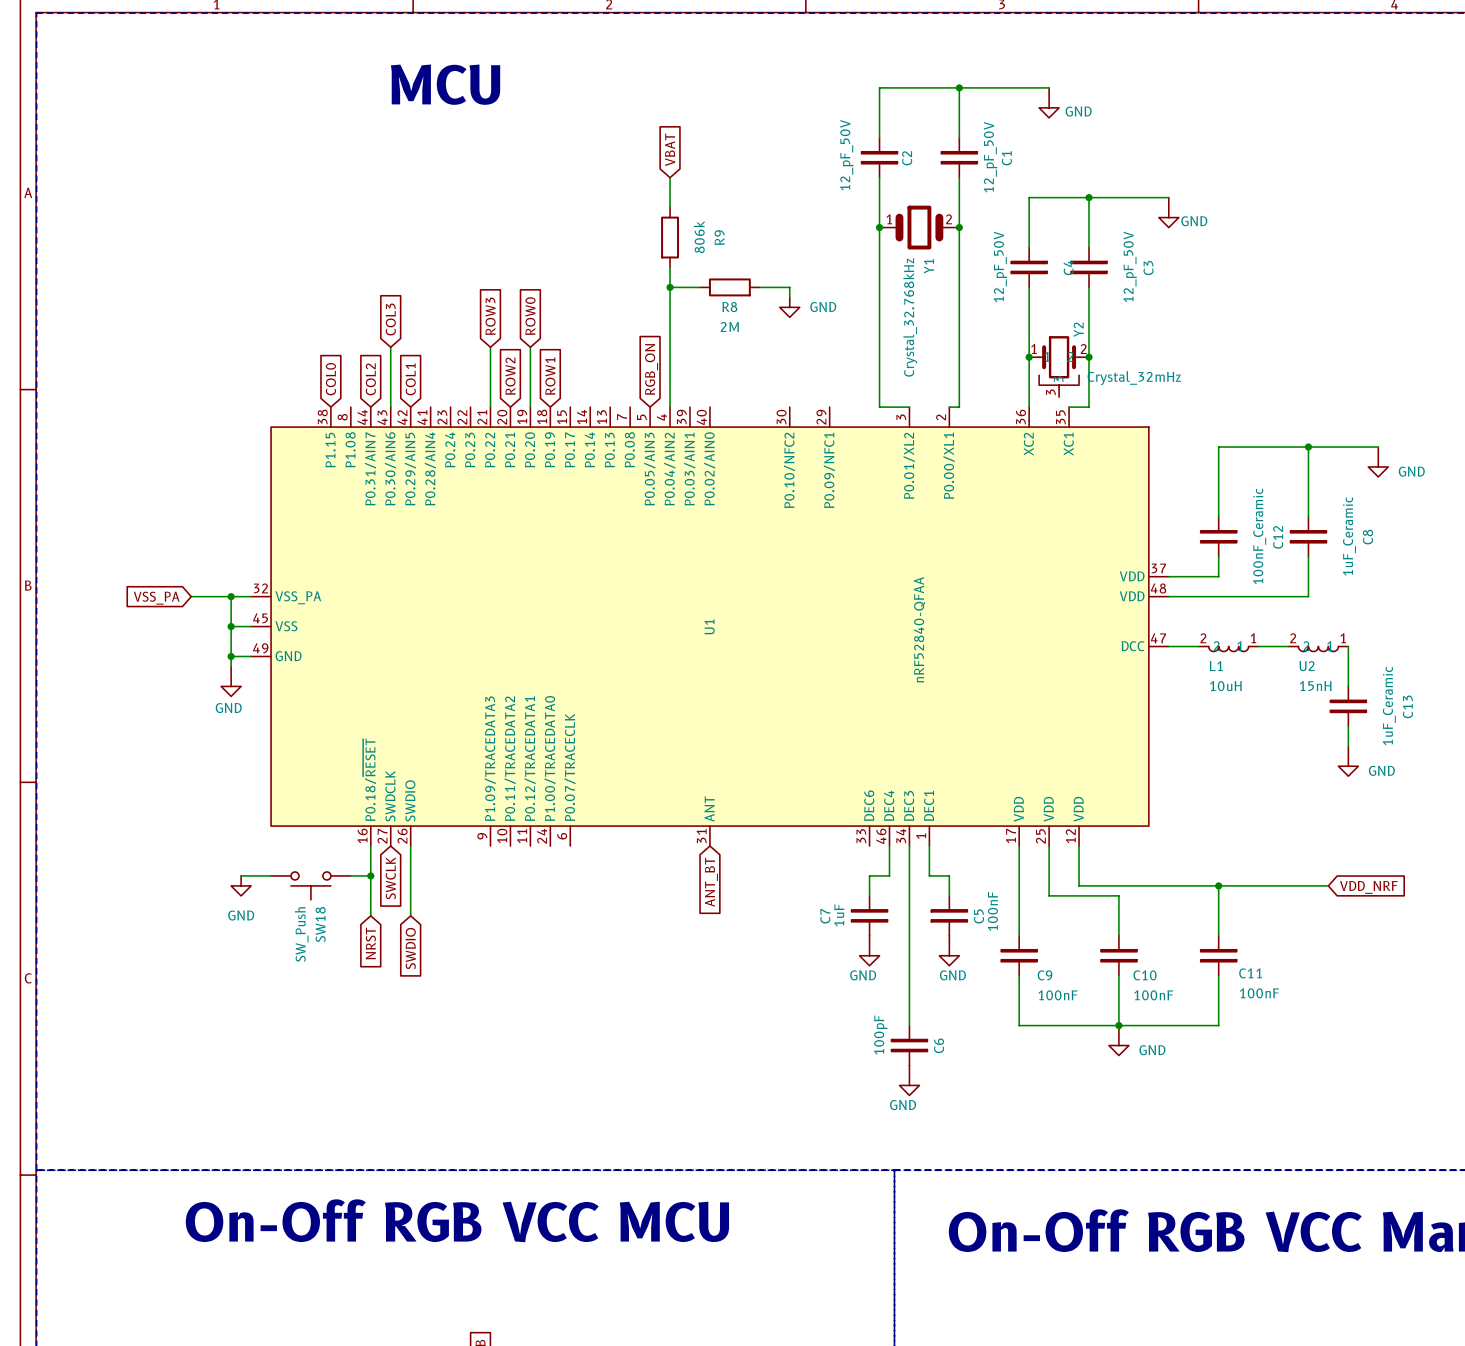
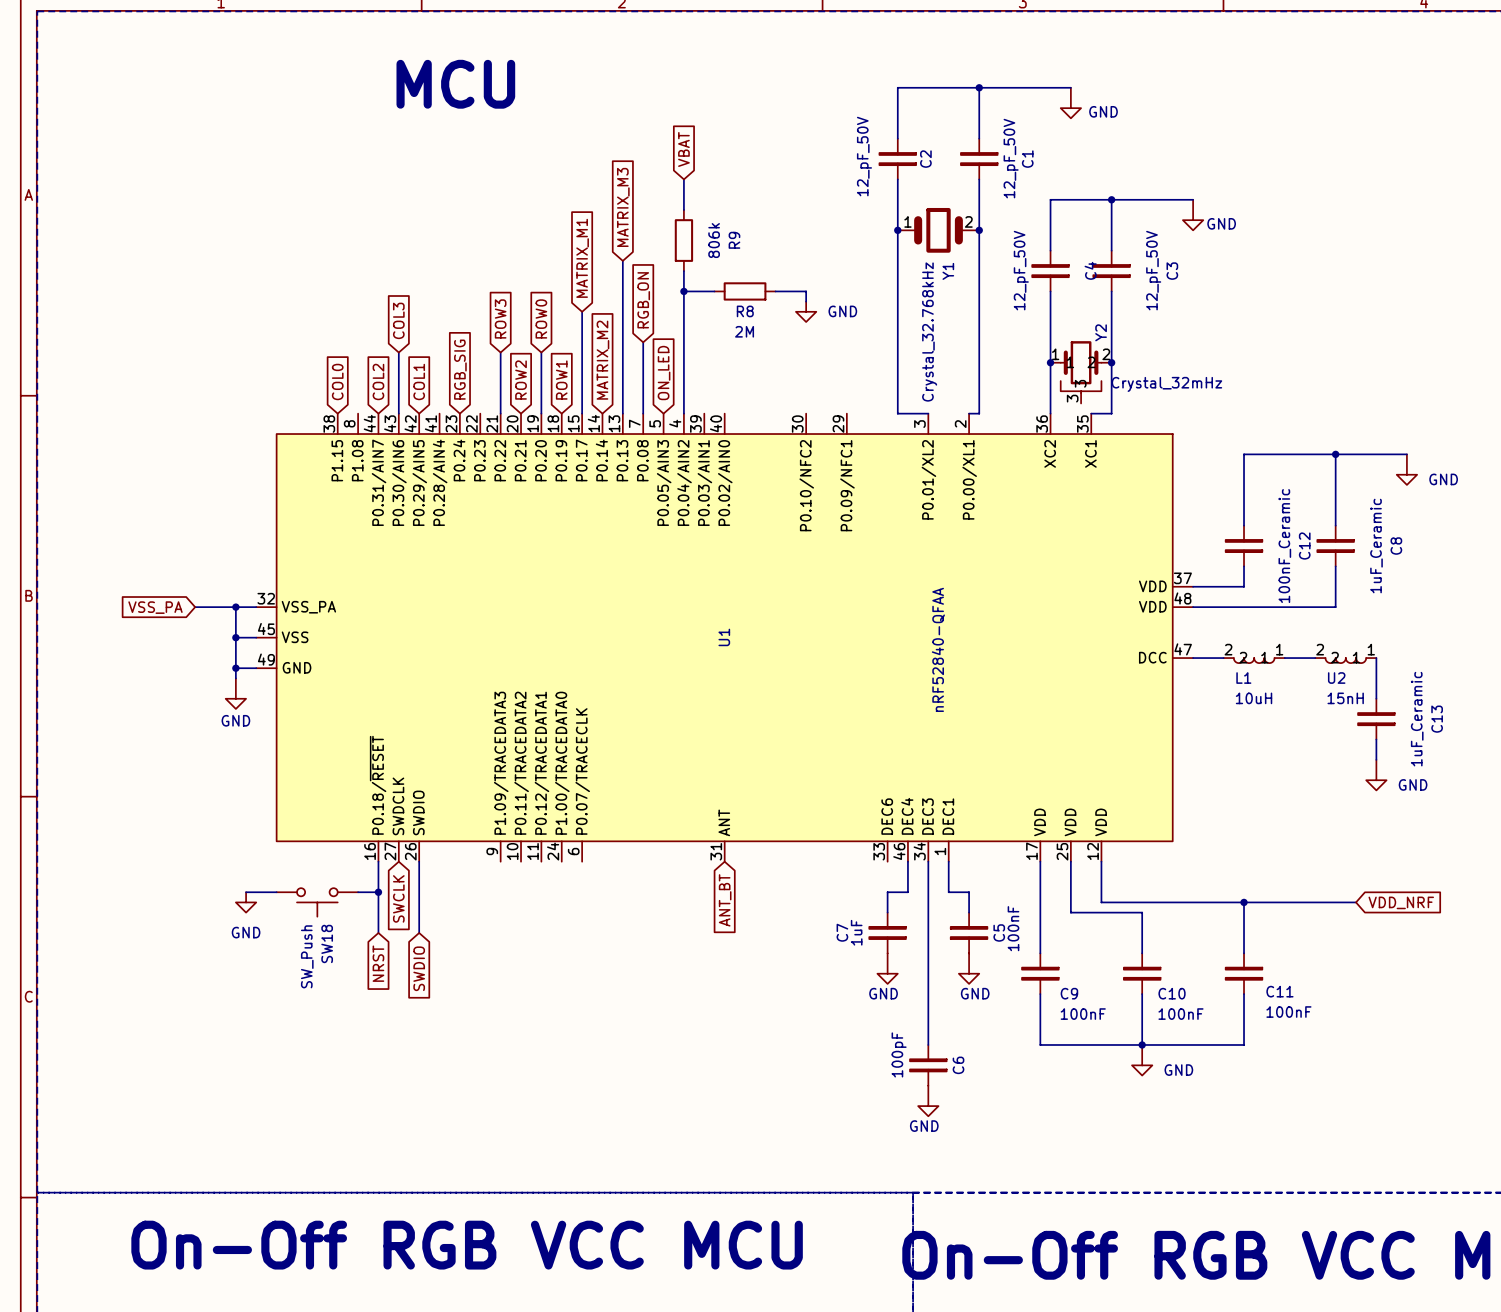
global label: none -> MATRIX_M3 (623, 207)
wire: none -> (622, 260) (622, 413)
global label: none -> MATRIX_M1 (582, 258)
global label: none -> RGB_ON (643, 300)
wire: none -> (582, 311) (582, 413)
wire: none -> (643, 342) (643, 413)
global label: none -> MATRIX_M2 (602, 360)
global label: none -> RGB_SIG (460, 369)
global label: RGB_ON (651, 369) -> ON_LED (664, 373)

